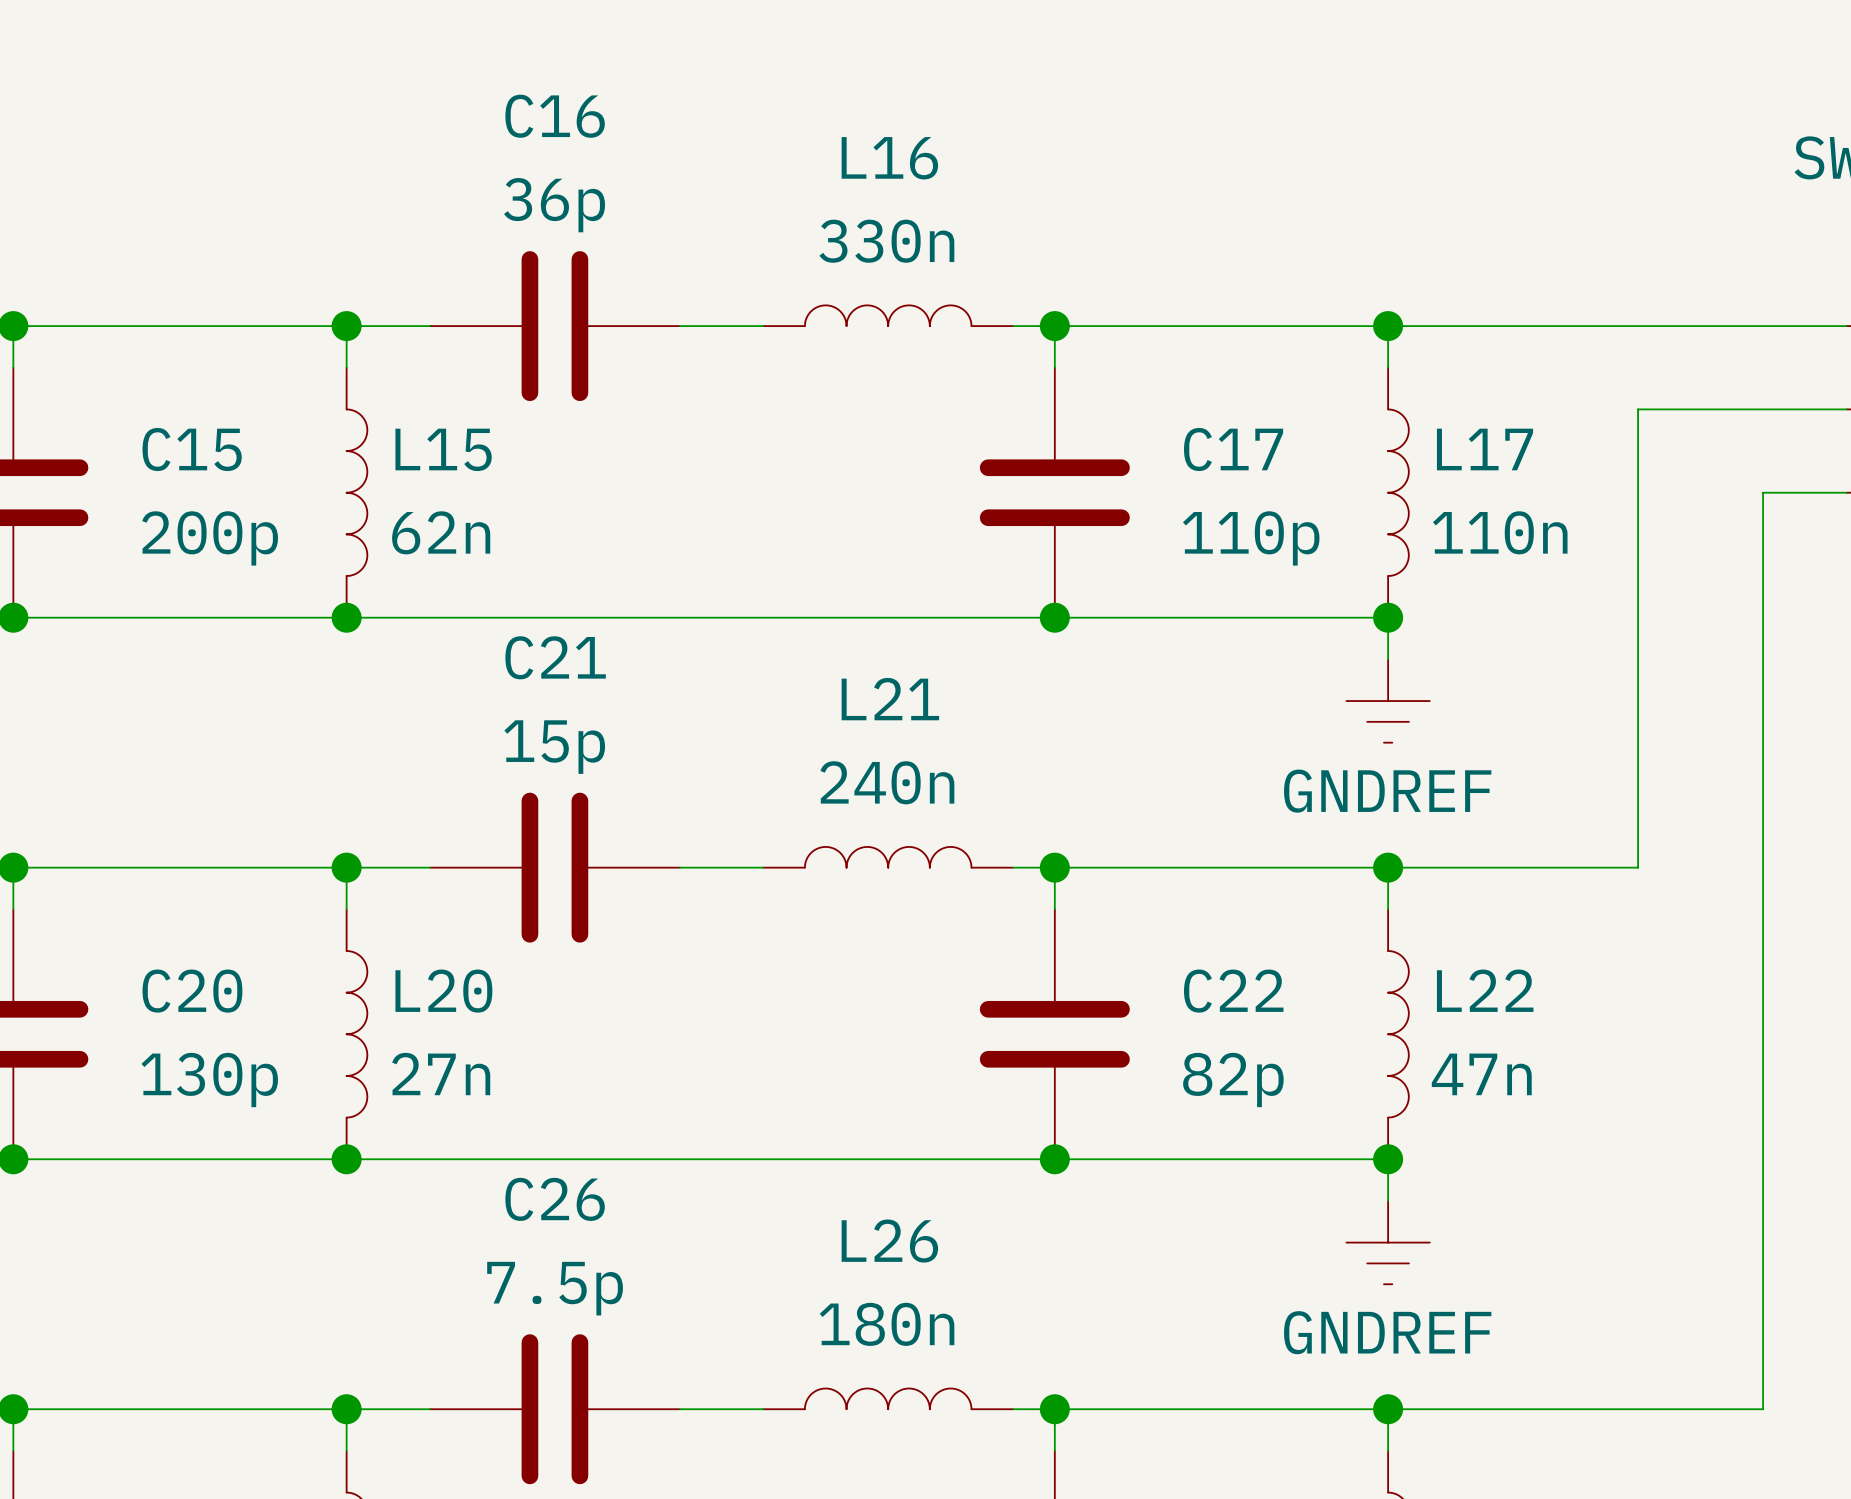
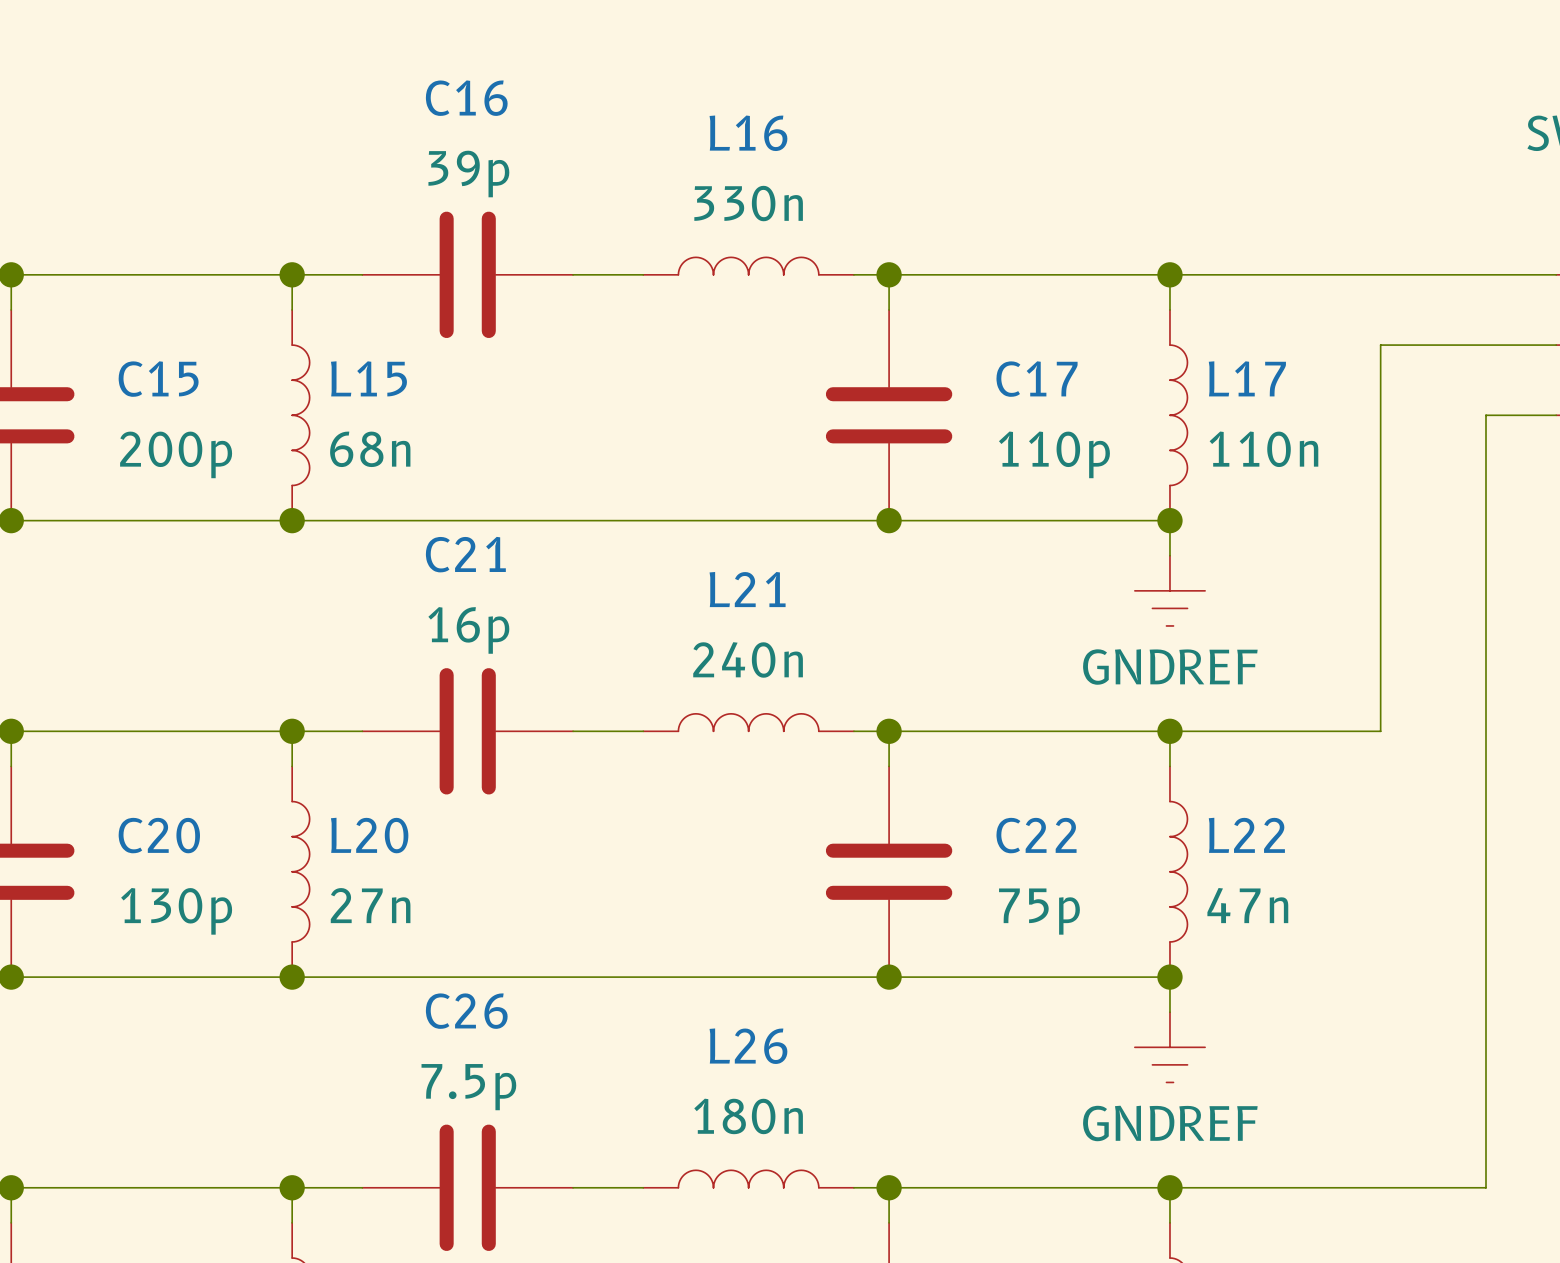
C16 value: 36p (554, 205) -> 39p (468, 174)
L15 value: 62n (441, 532) -> 68n (370, 449)
C21 value: 15p (554, 747) -> 16p (468, 630)
C22 value: 82p (1233, 1080) -> 75p (1039, 911)

